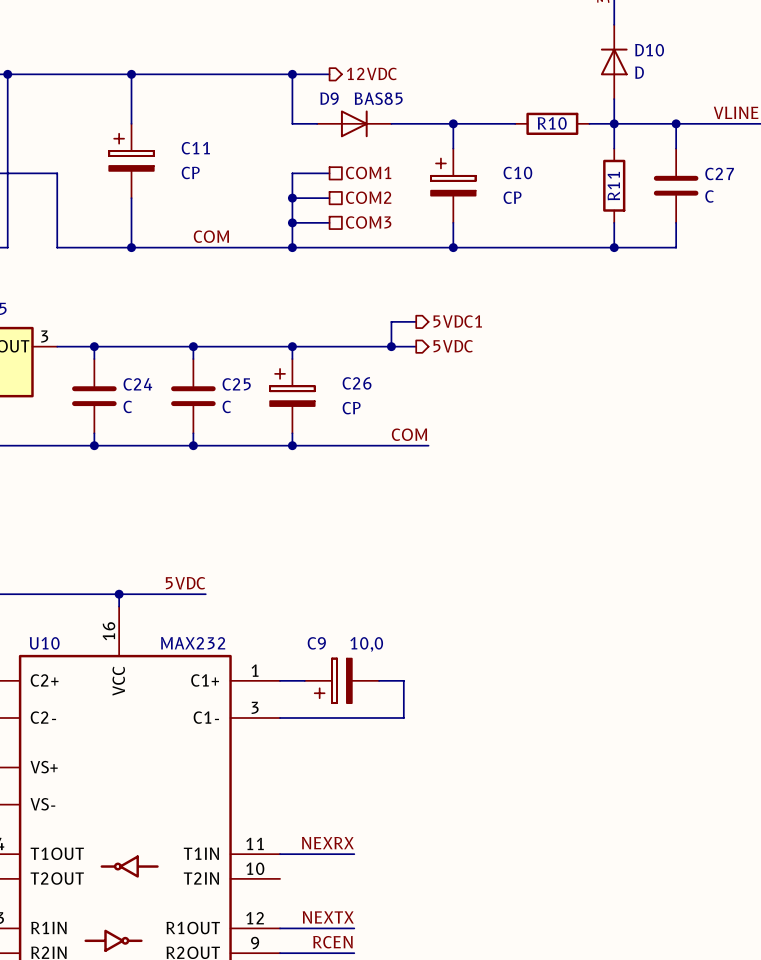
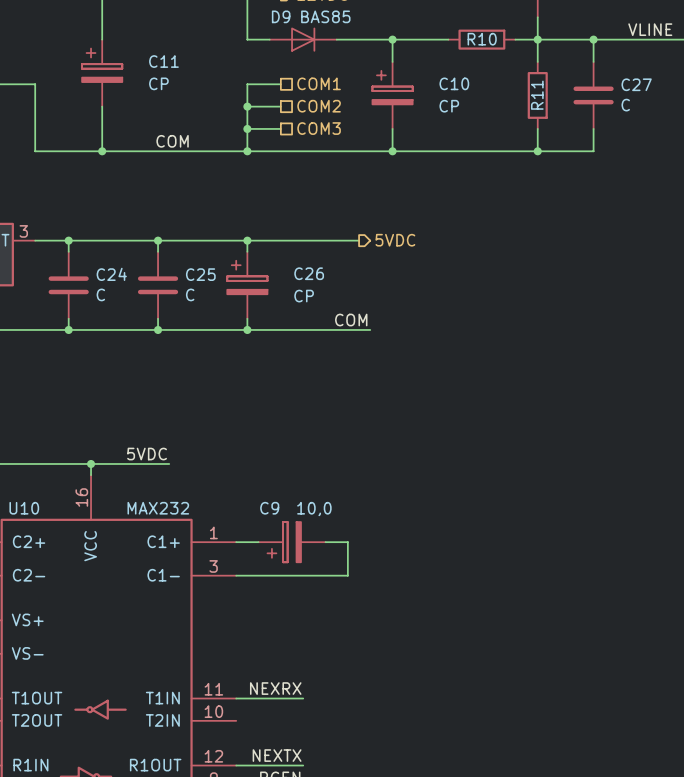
wire: (416, 321) (391, 321) (391, 346) -> none
hierarchical label: 5VDC1 (457, 321) -> none
junction: (391, 346) -> none

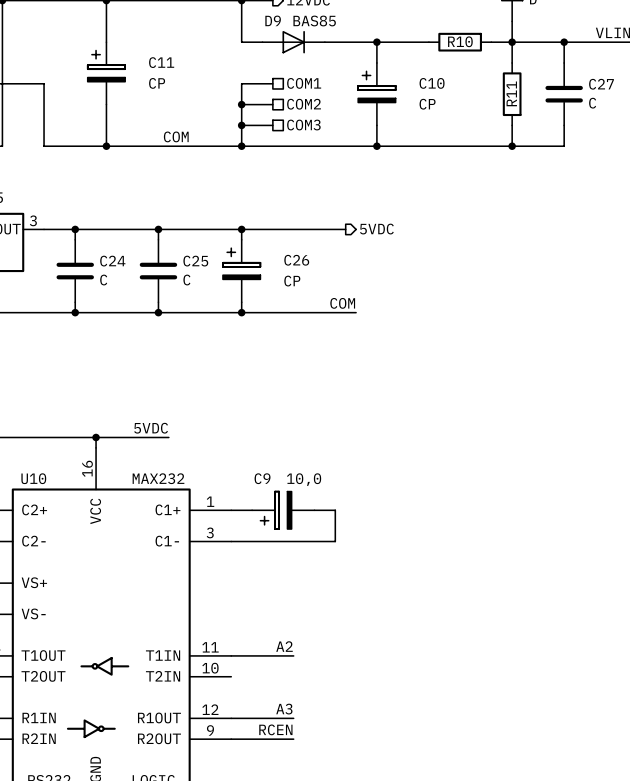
label: NEXRX (275, 688) -> A2 (284, 646)
label: NEXTX (277, 755) -> A3 (284, 709)

